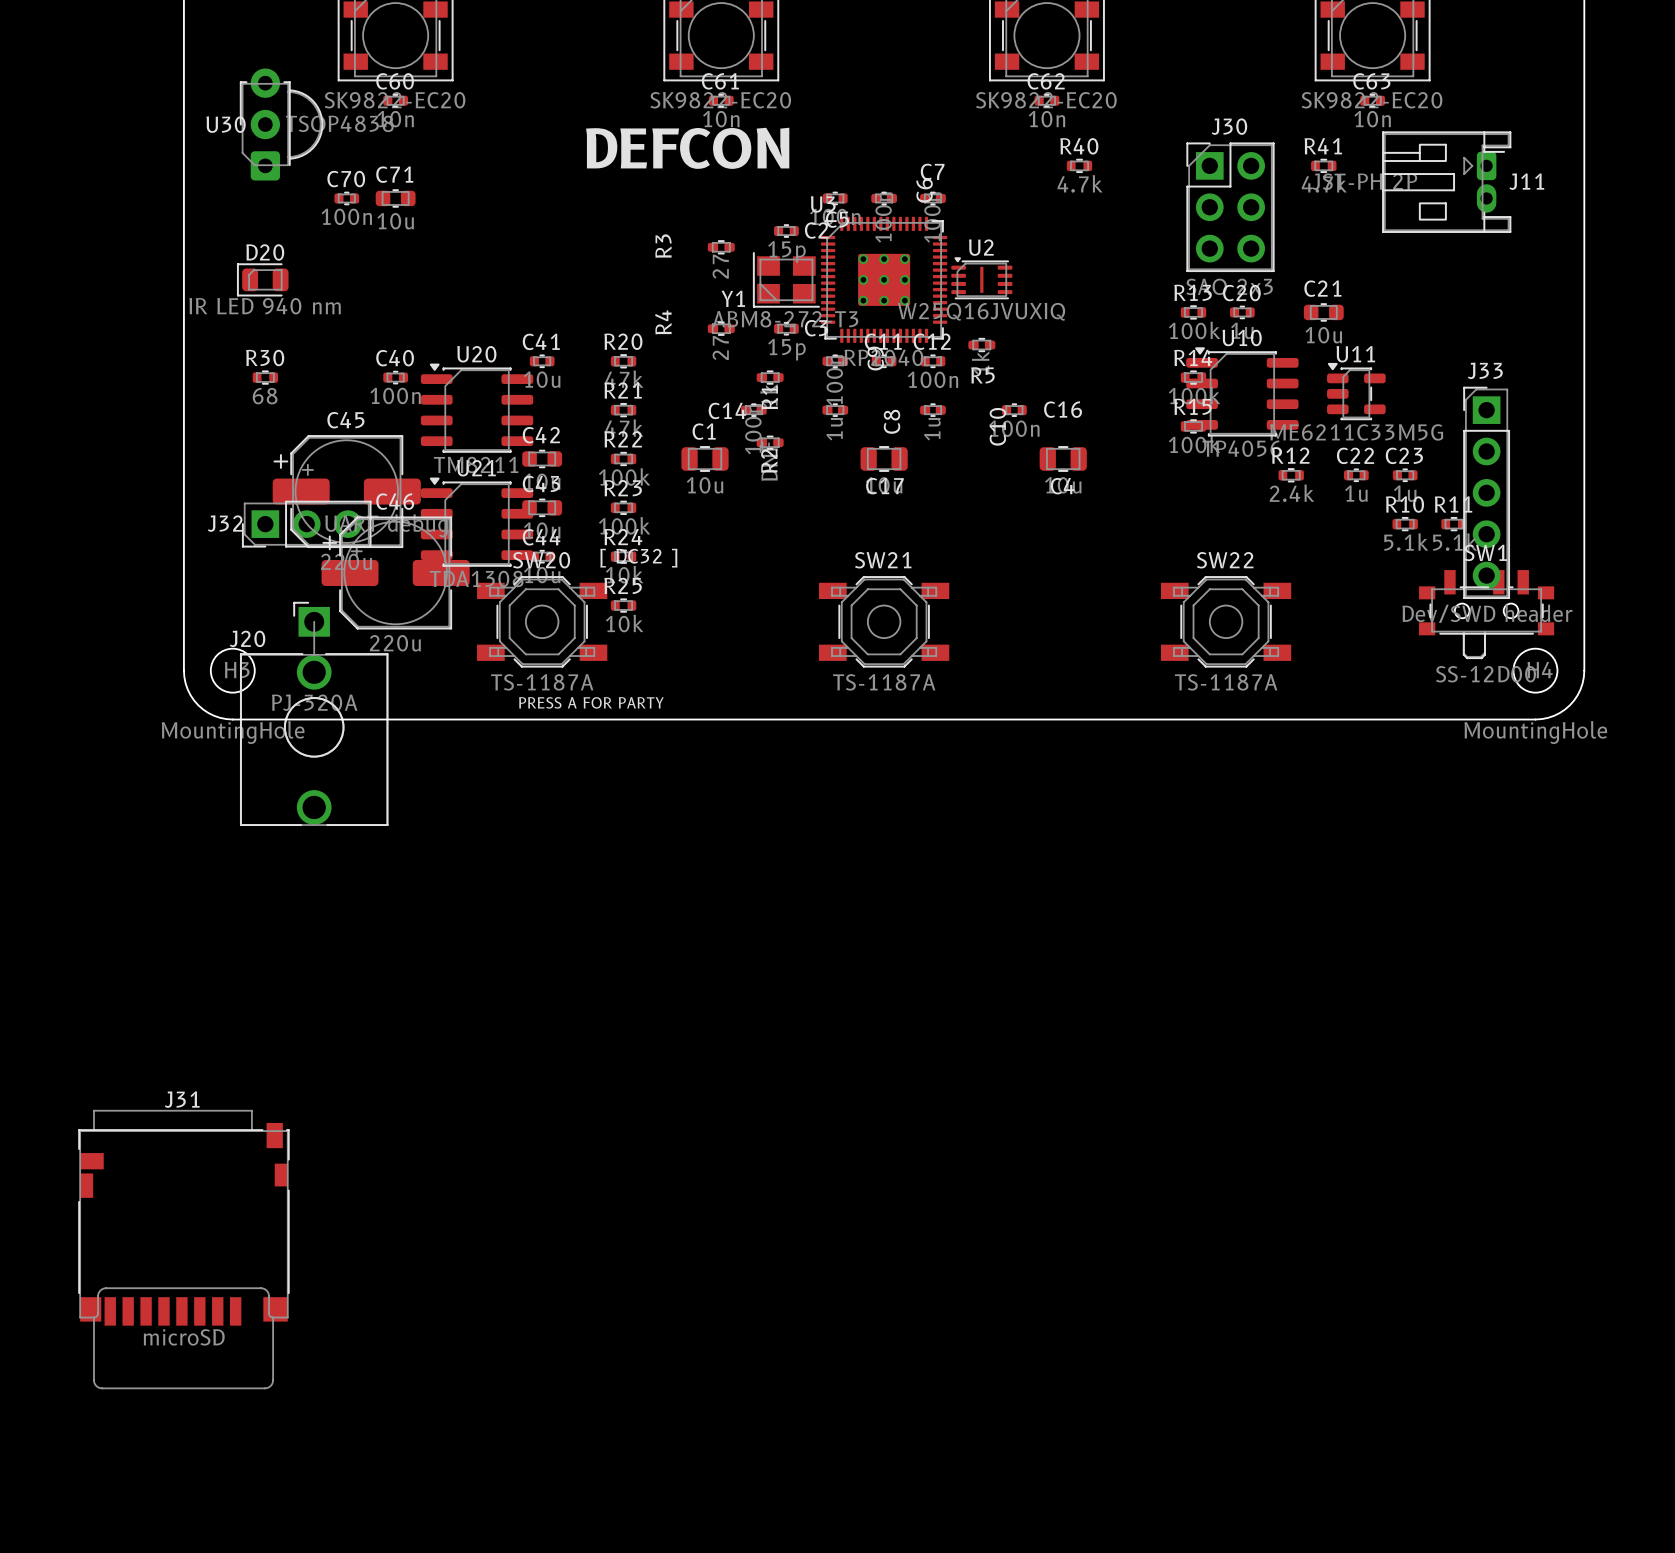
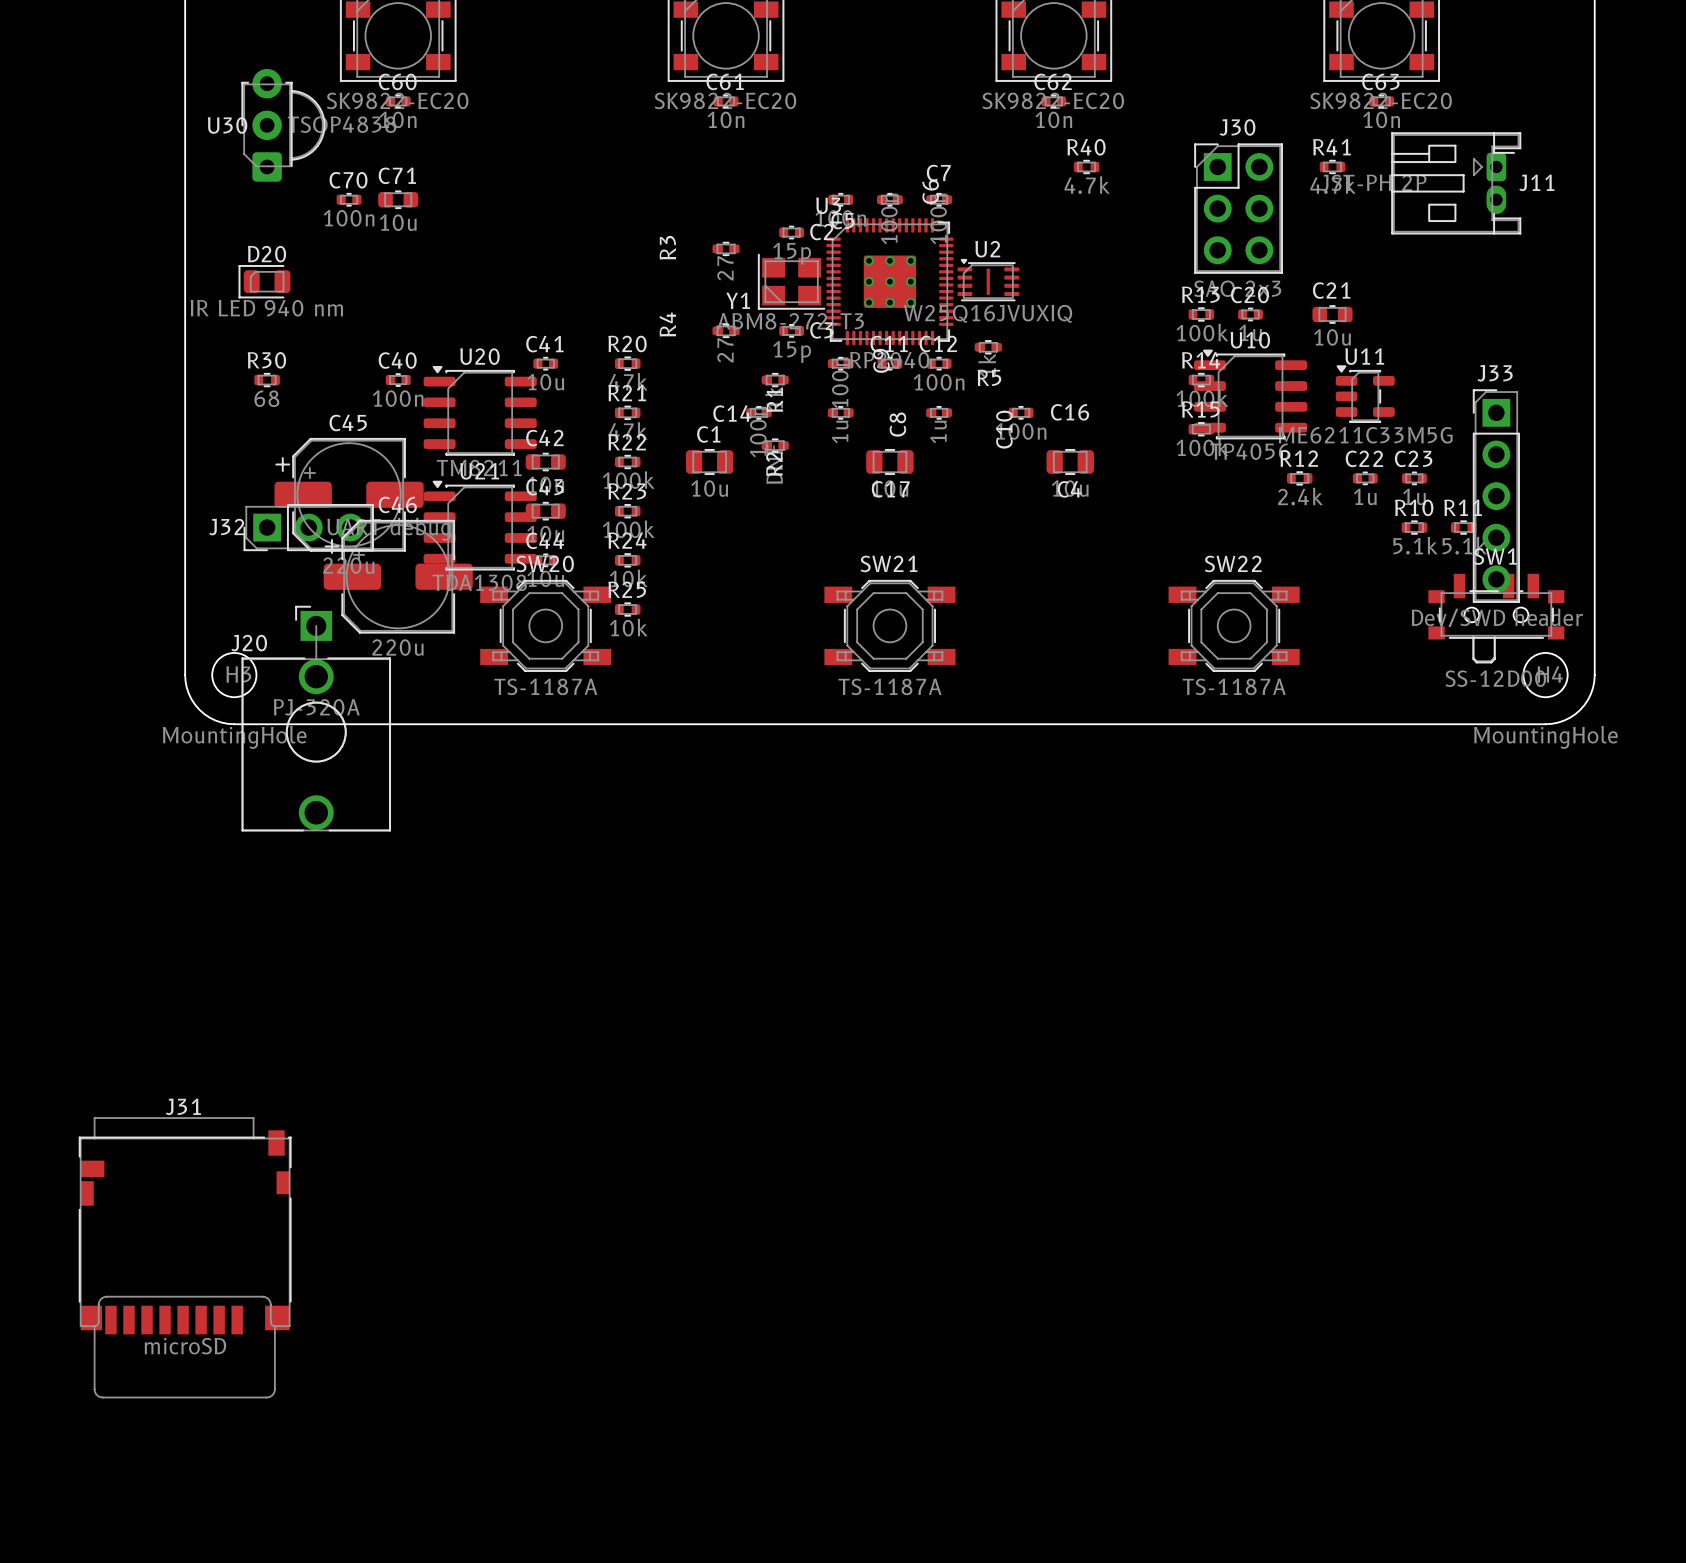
text: DEFCON (687, 148) -> none
text: [ DC32 ] (638, 558) -> none
text: PRESS A FOR PARTY (591, 702) -> none

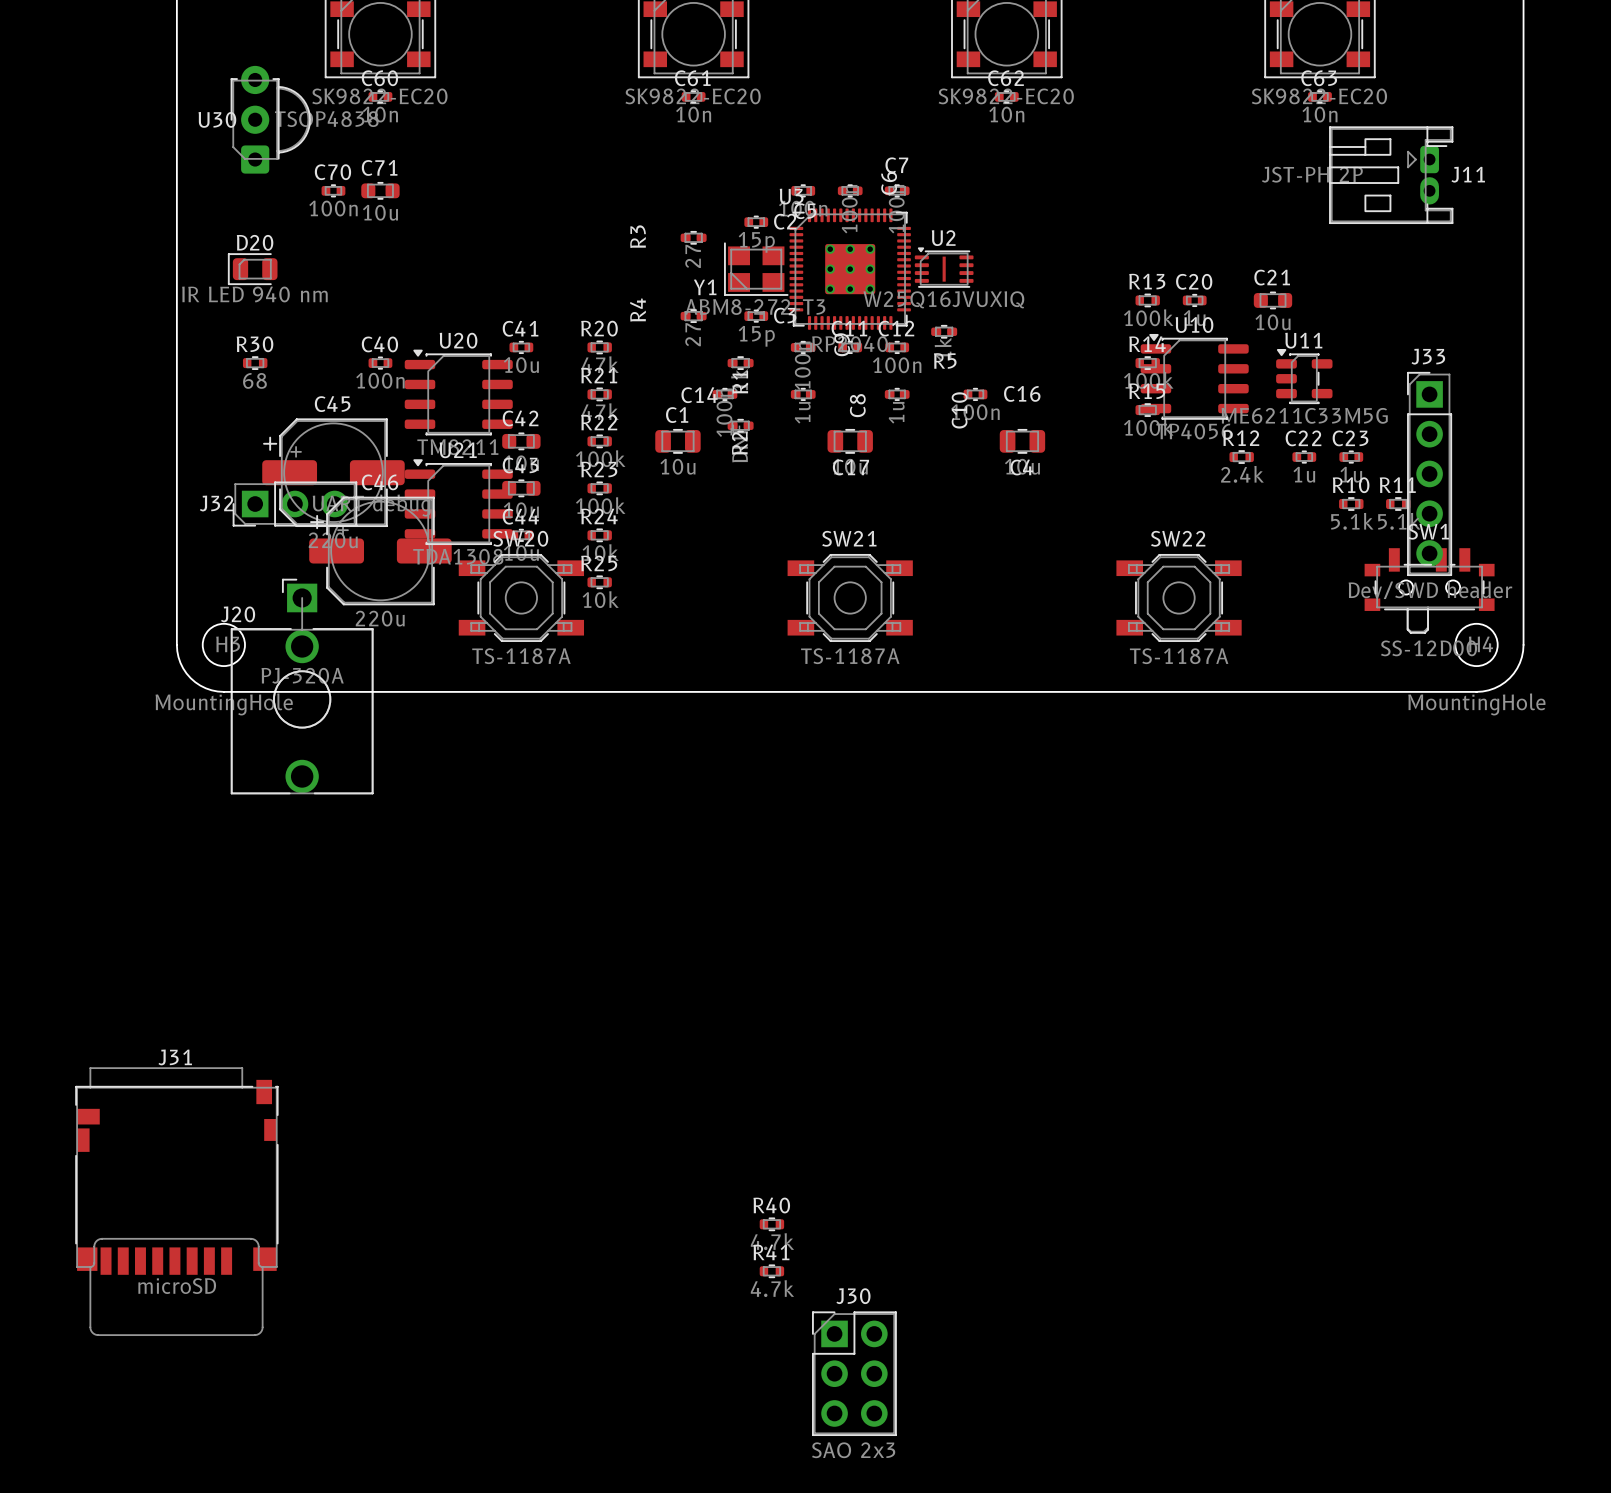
R40 position: (1086, 166) -> (771, 1224)
R41 position: (1332, 166) -> (771, 1271)
J30 position: (1238, 208) -> (854, 1373)

